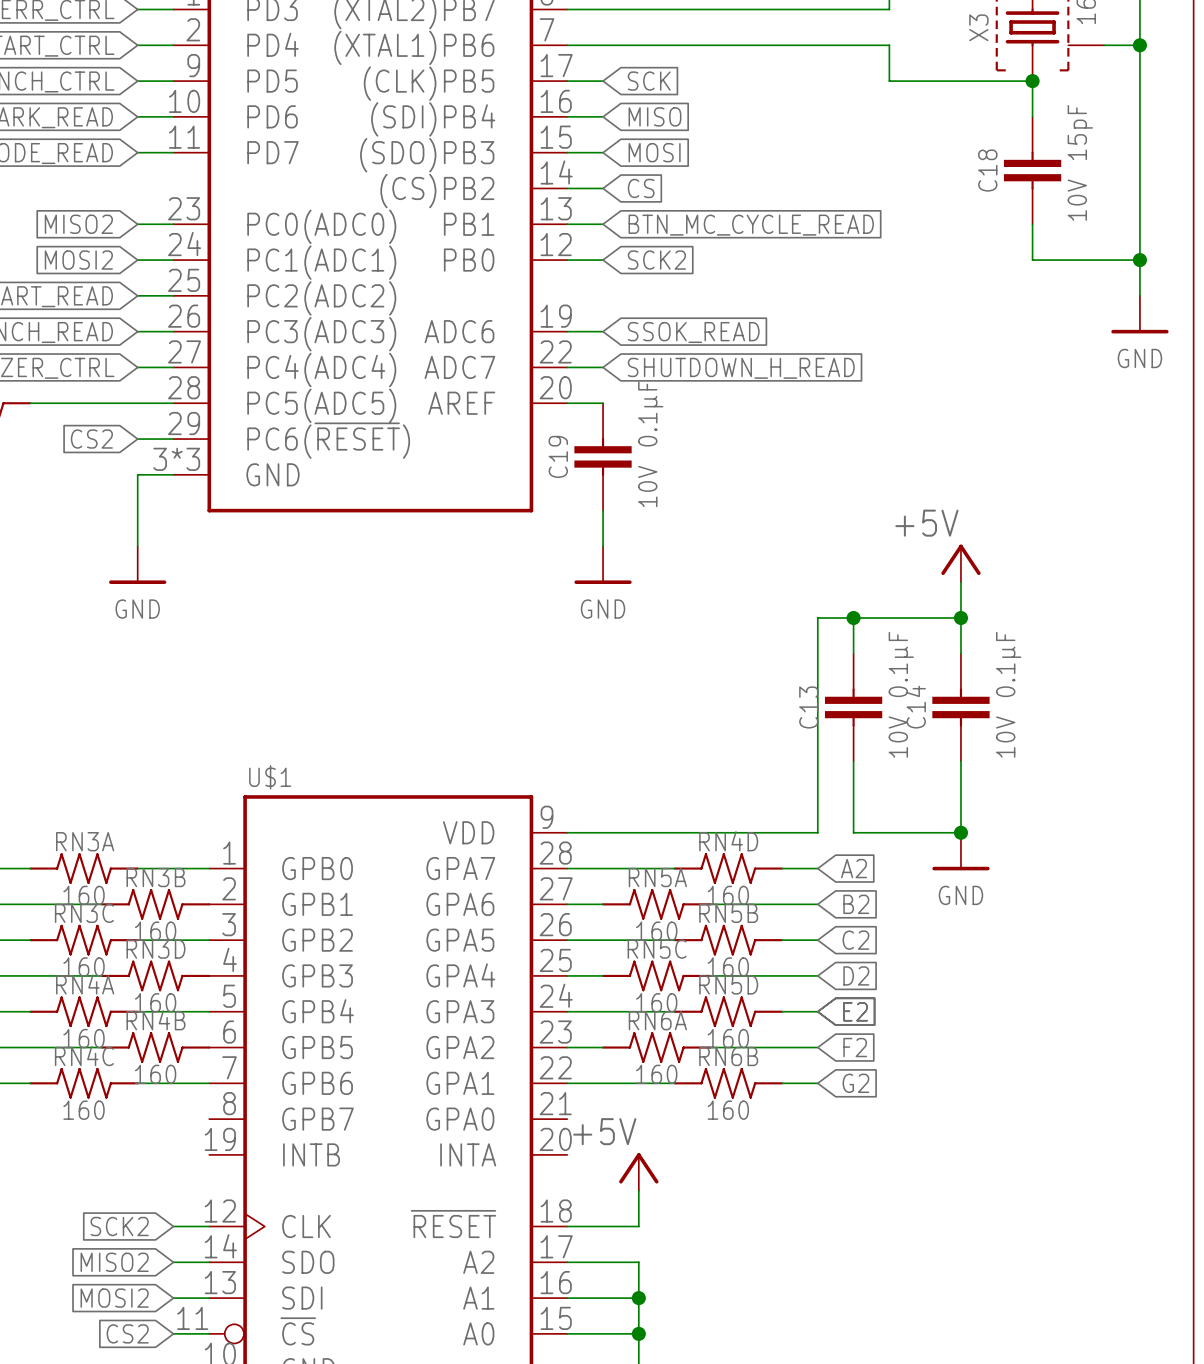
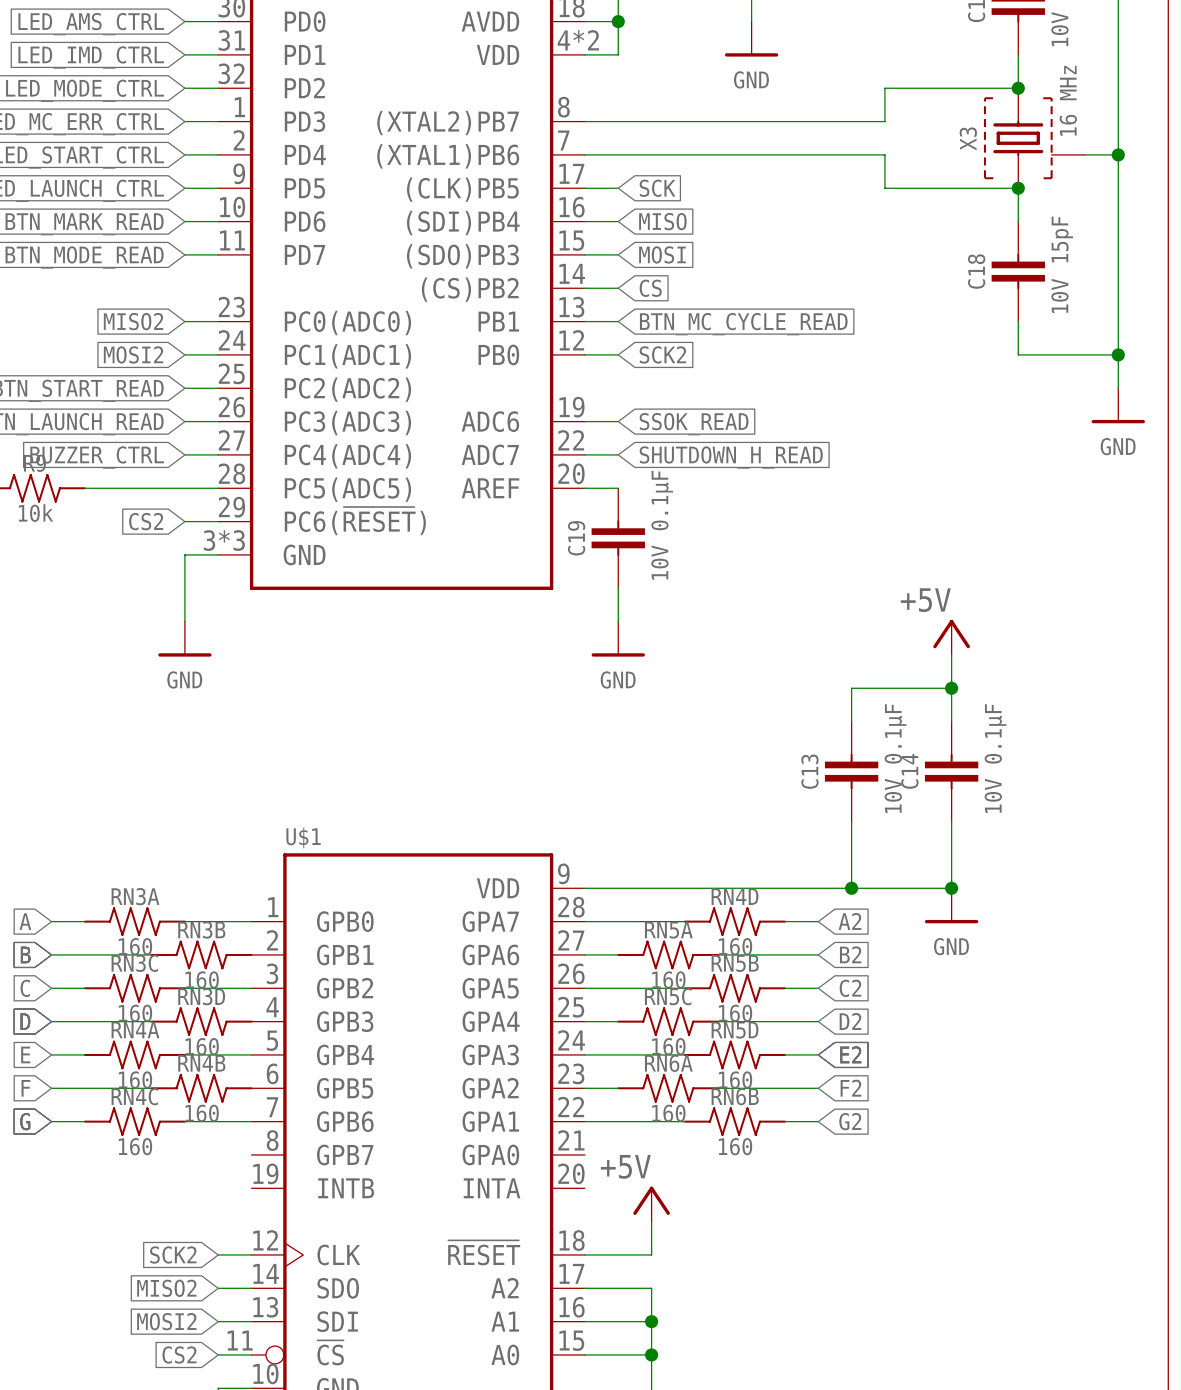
wire: (853, 618) (817, 618) (817, 832) -> (851, 888) (818, 888)
junction: (853, 618) -> none
junction: none -> (851, 888)

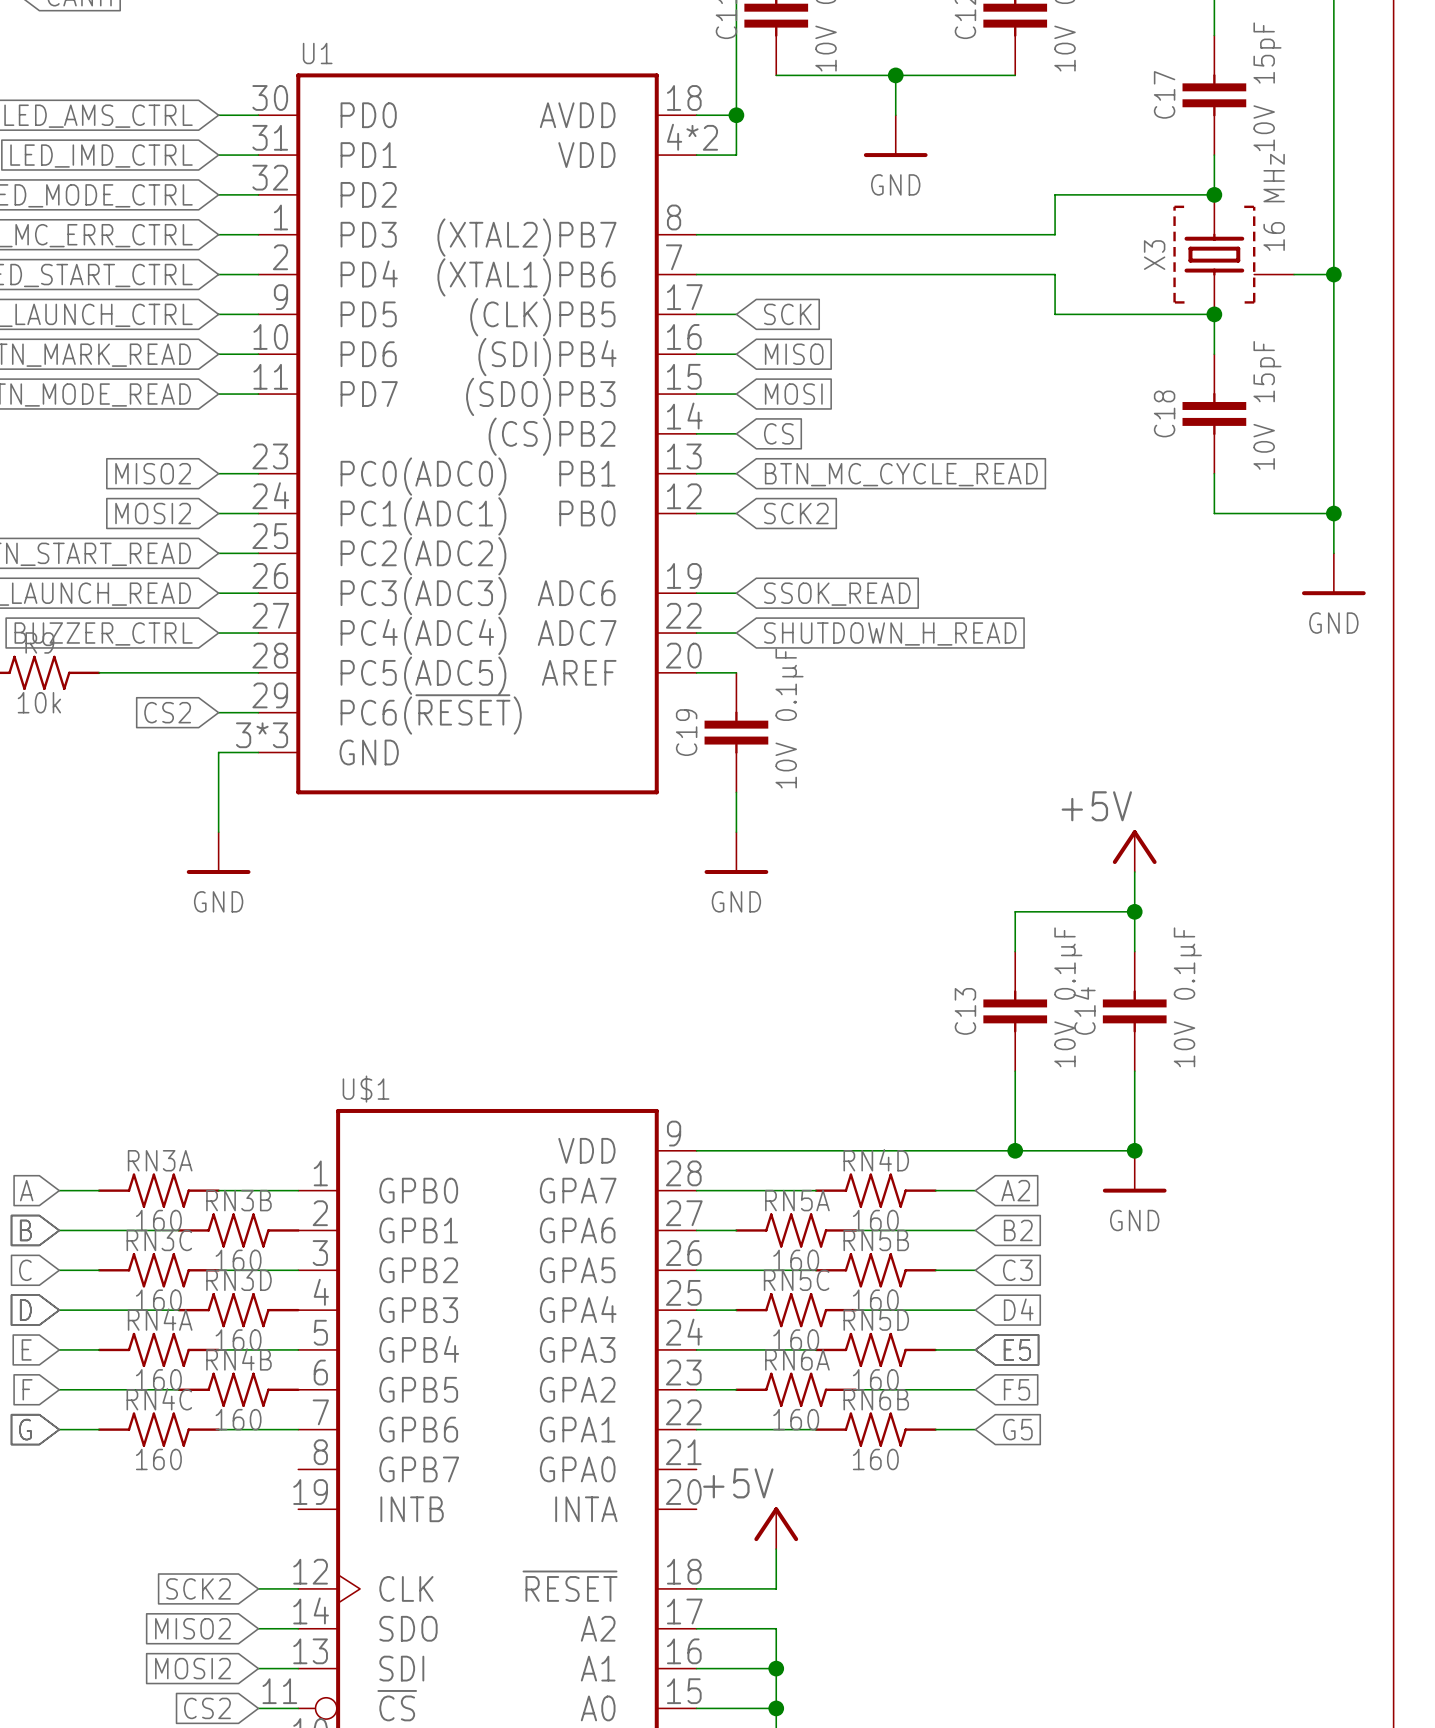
global label: C2 (850, 988) -> C3 (1017, 1270)
global label: D2 (850, 1021) -> D4 (1018, 1309)
global label: E2 (850, 1054) -> E5 (1017, 1349)
global label: F2 (850, 1088) -> F5 (1016, 1389)
global label: G2 (850, 1121) -> G5 (1017, 1429)

